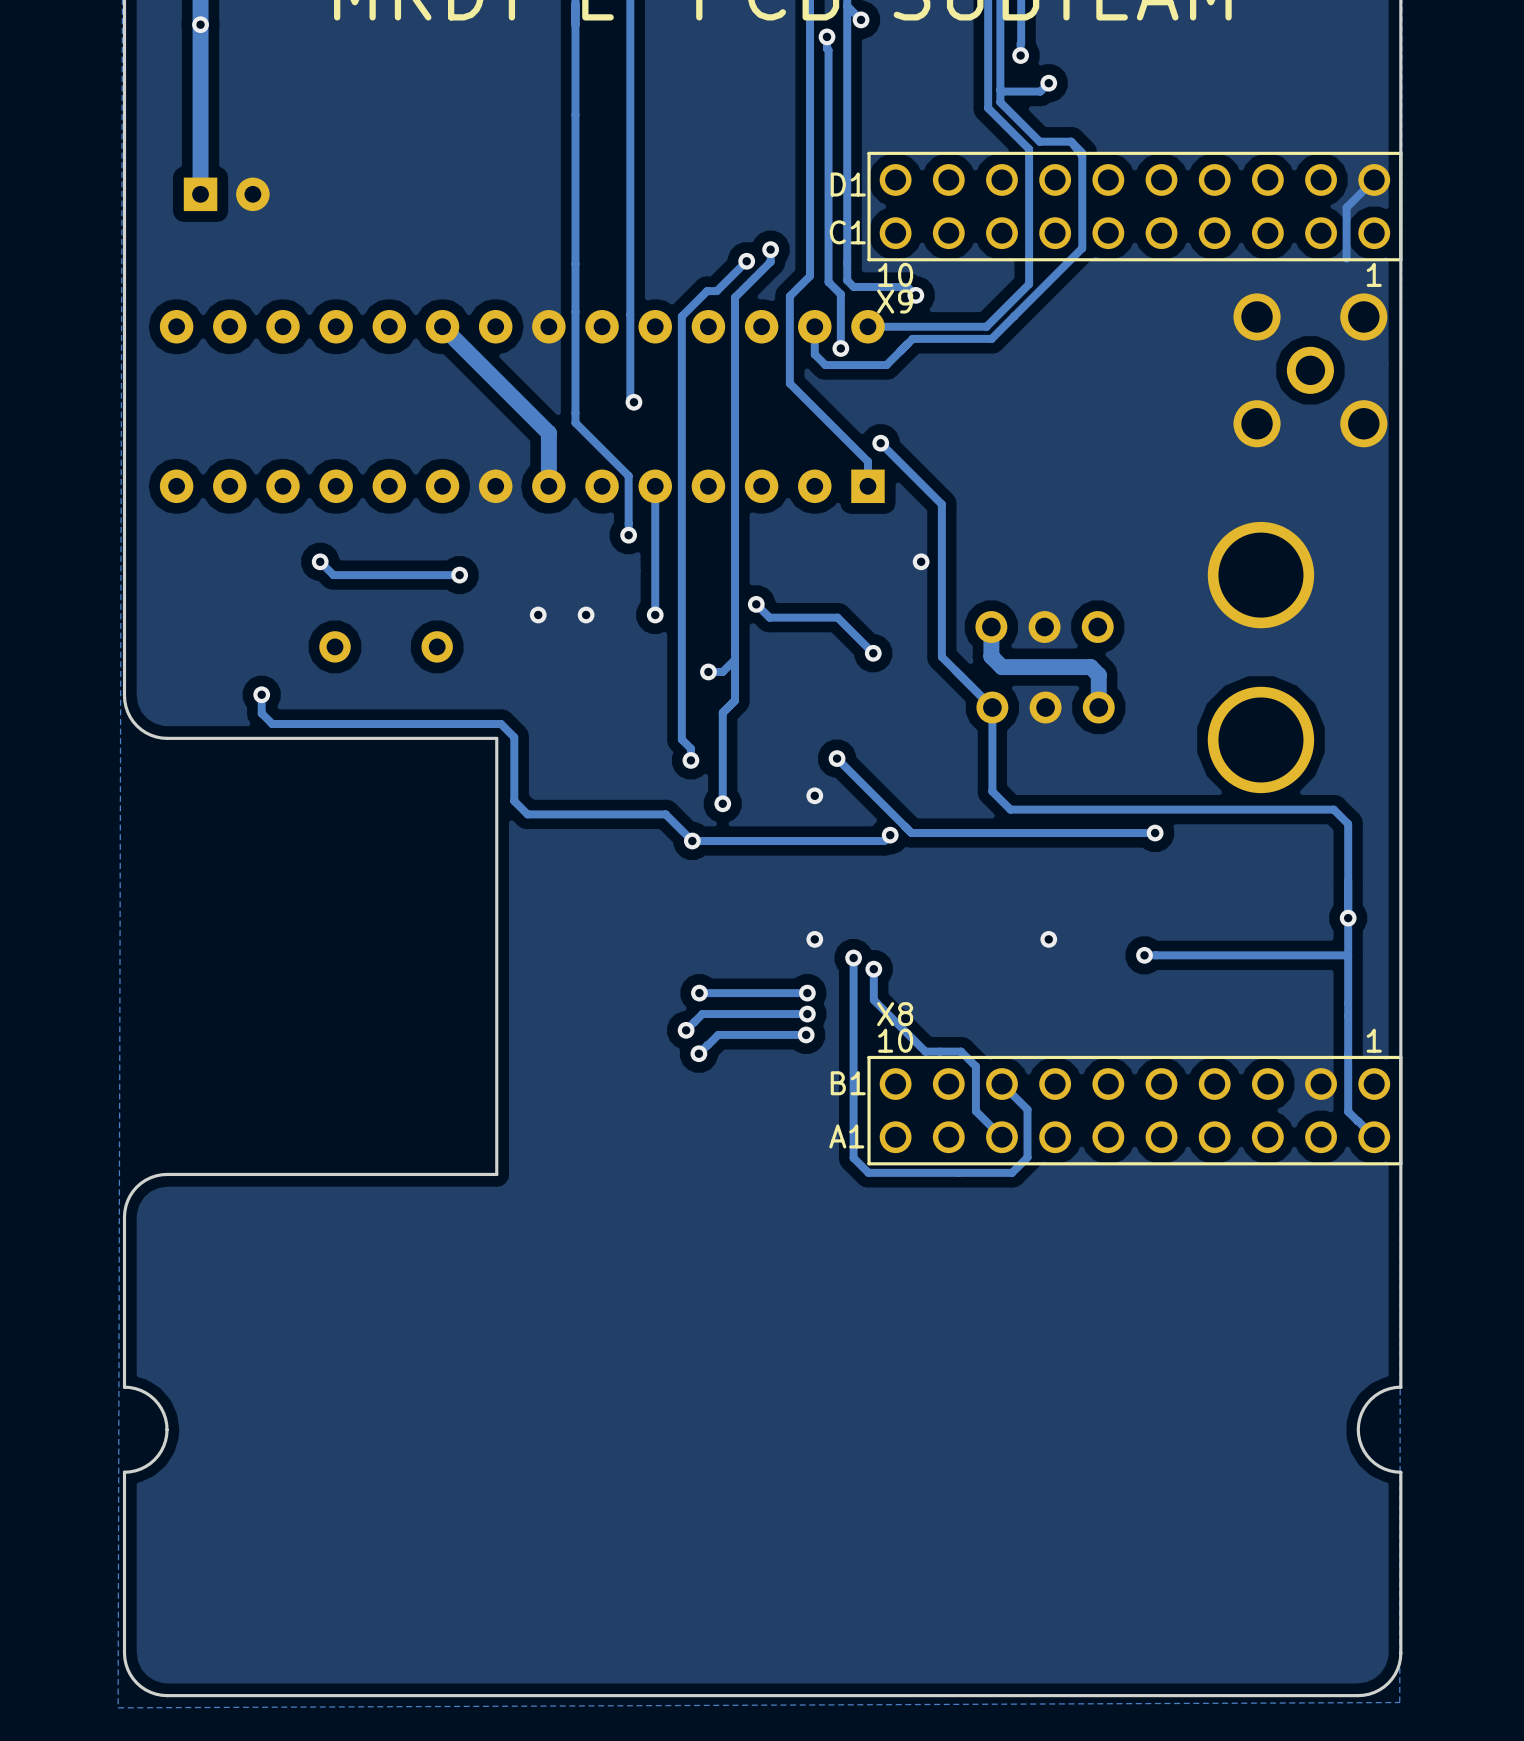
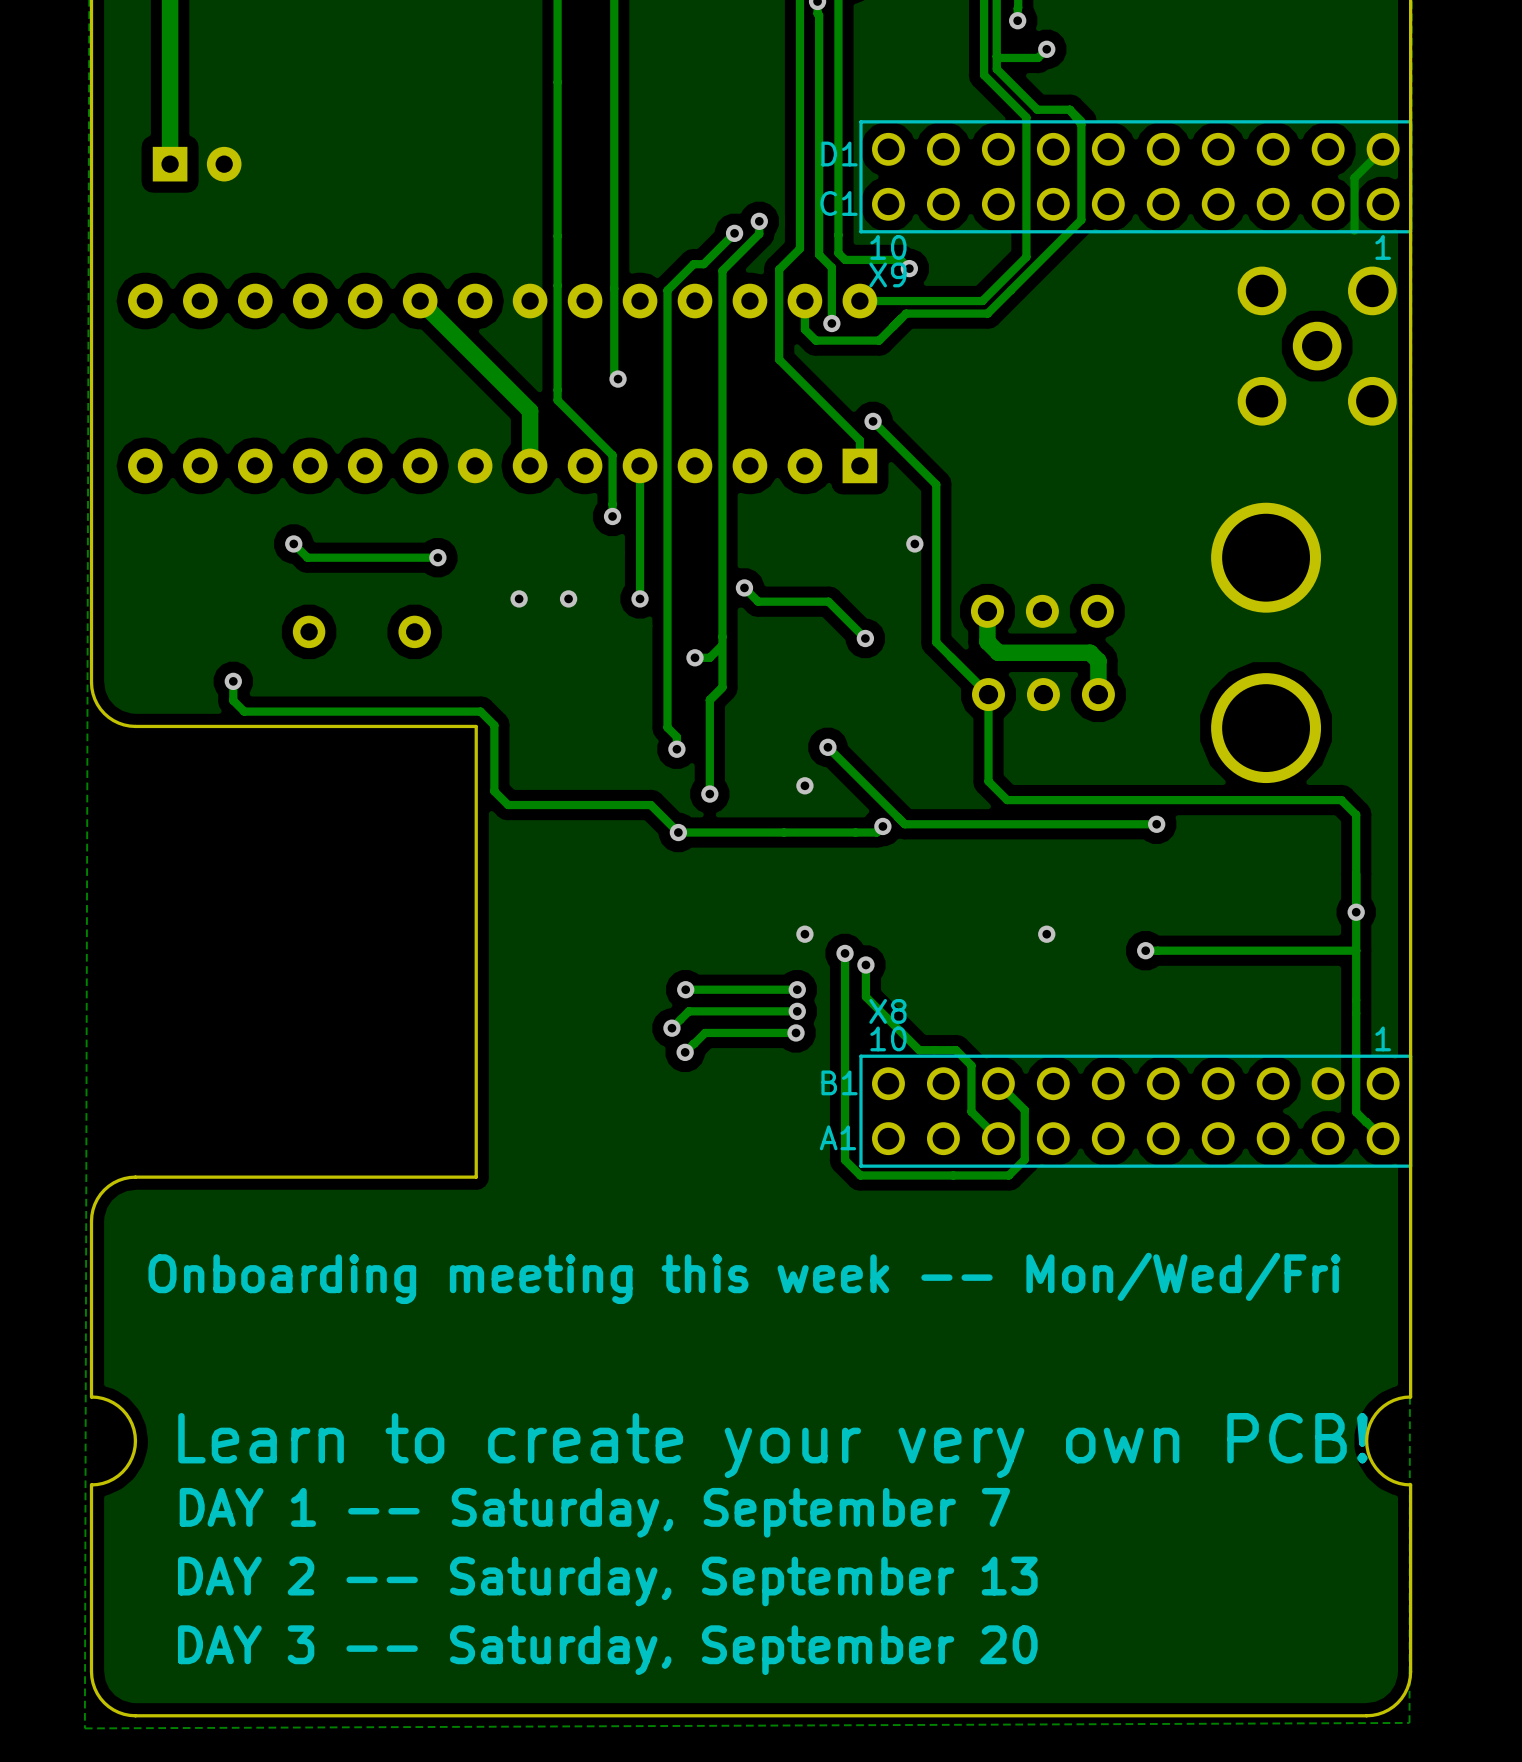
text: none -> Onboarding meeting this week -- Mon/Wed/Fri (744, 1278)
text: none -> Learn to create your very own PCB! (772, 1445)
text: none -> DAY 1 -- Saturday, September 7 (594, 1512)
text: none -> DAY 2 -- Saturday, September 13 (607, 1581)
text: none -> DAY 3 -- Saturday, September 20 (607, 1650)

